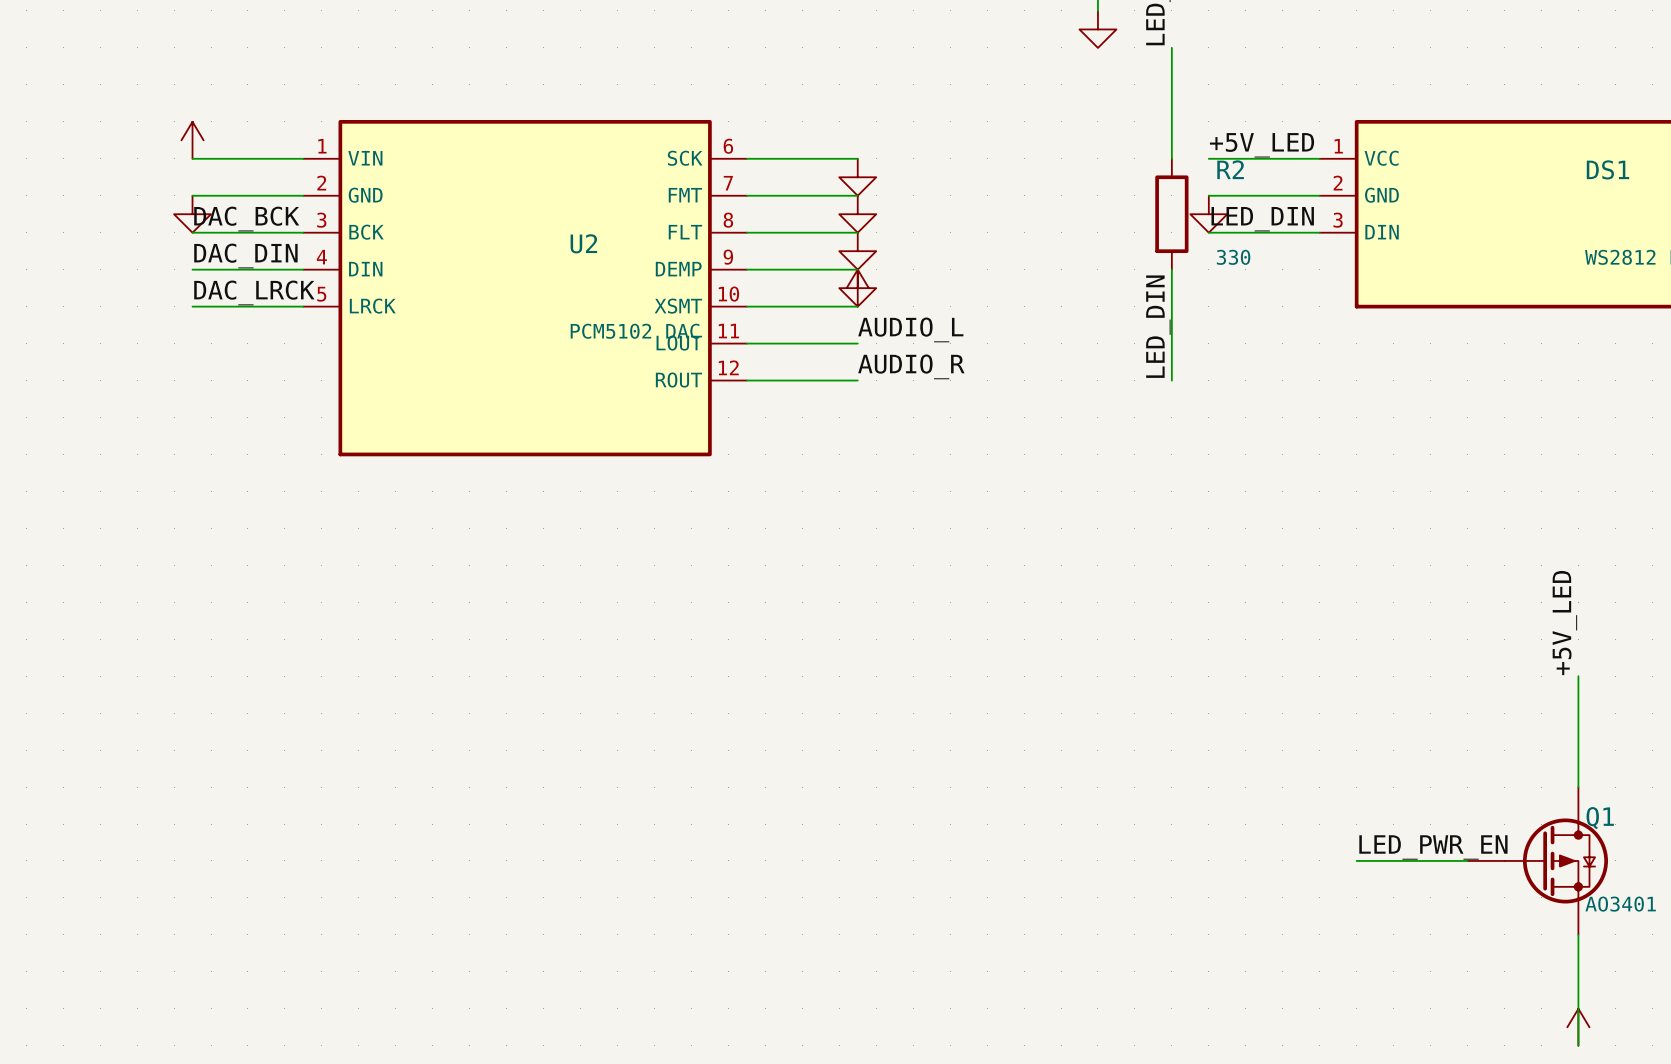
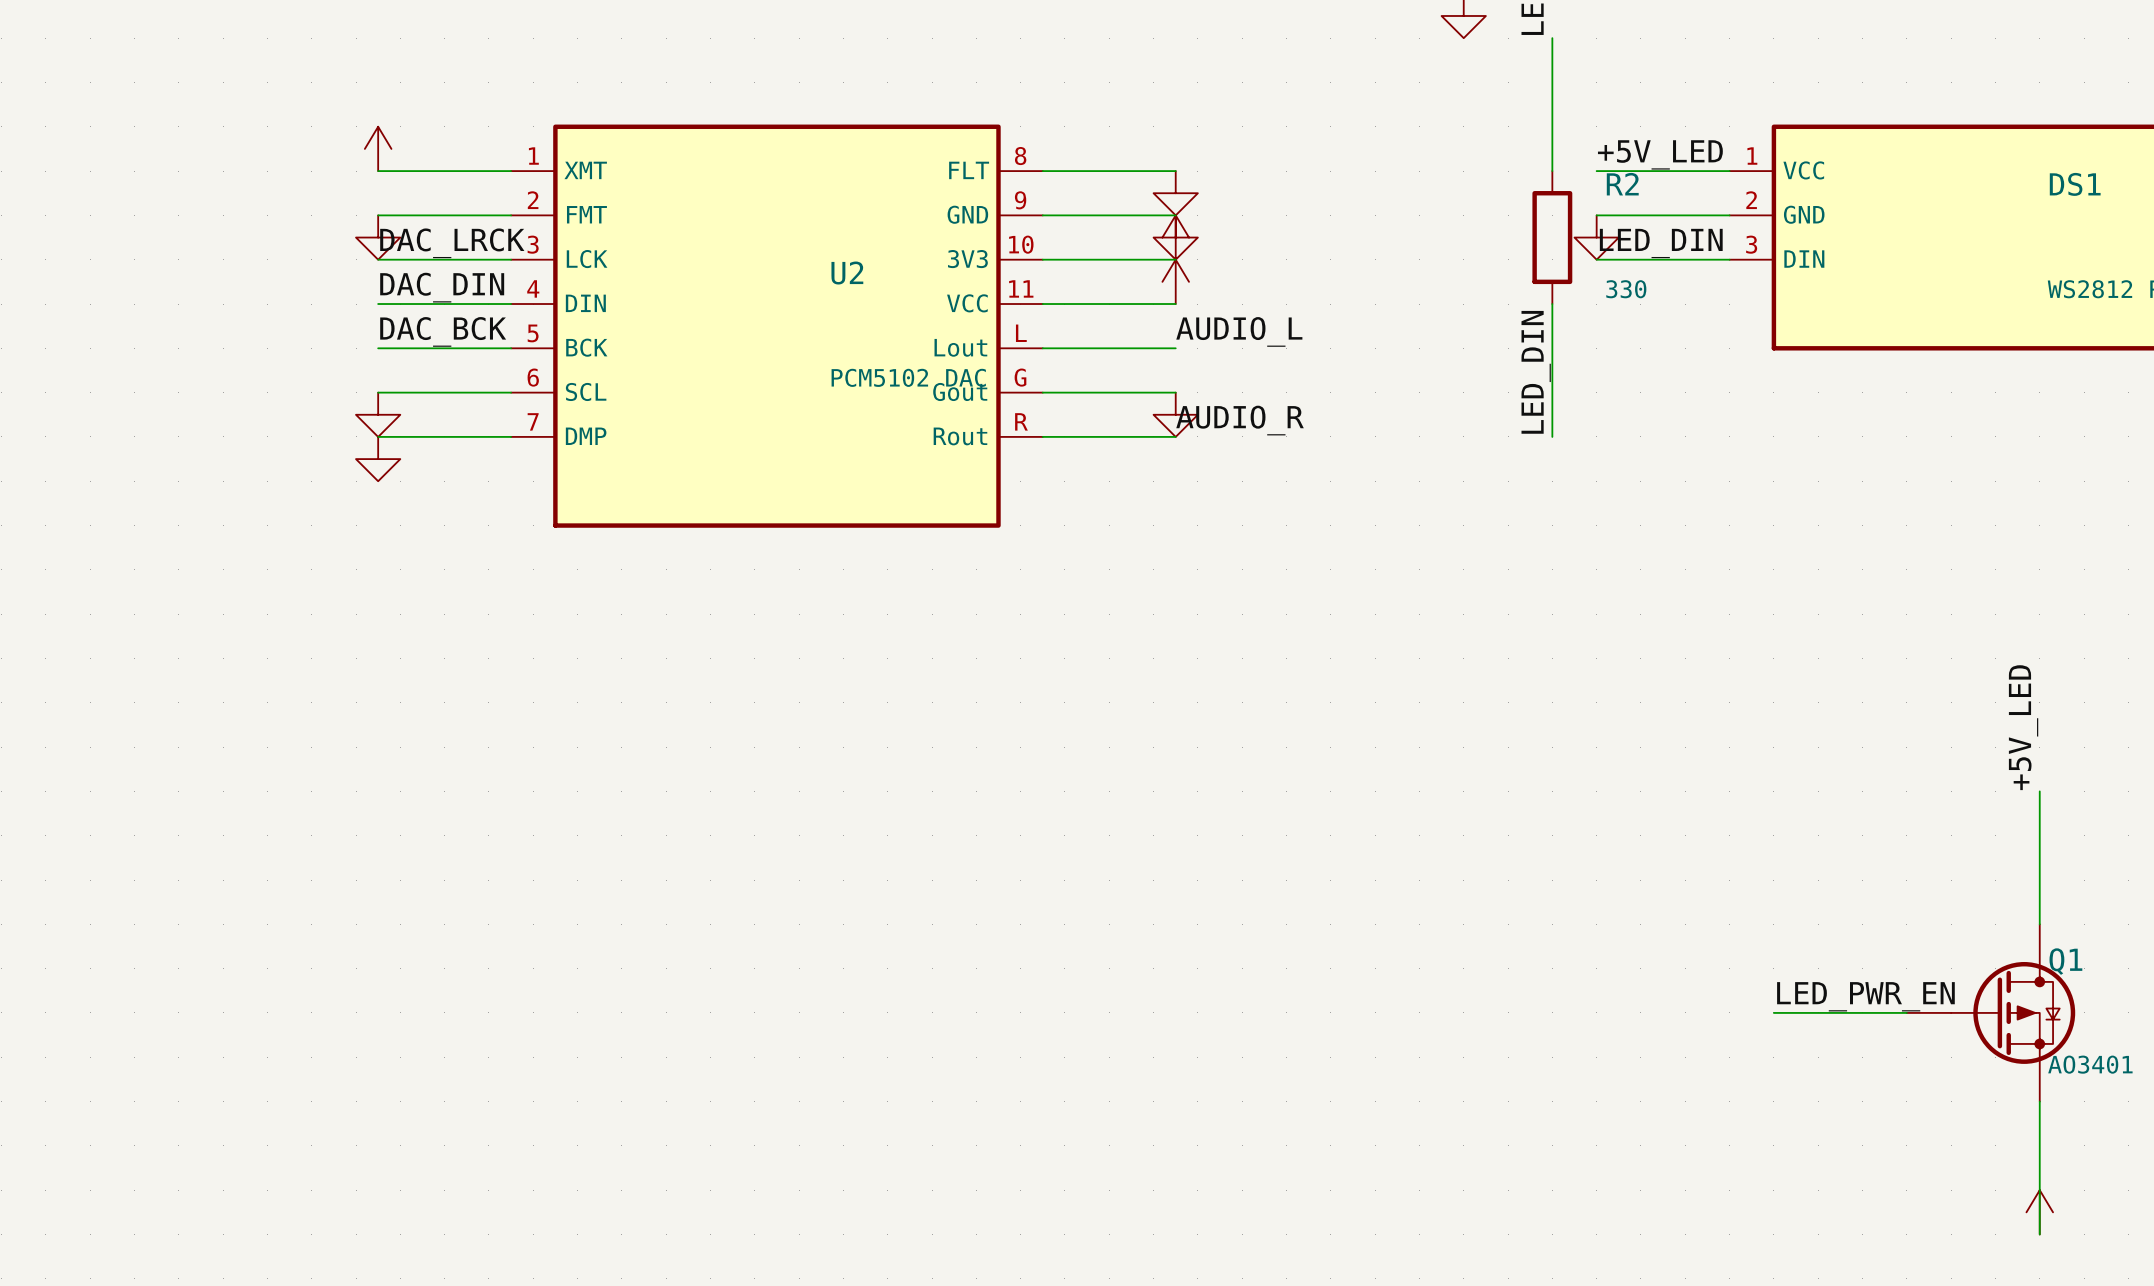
U2 symbol: [303, 119, 747, 457] -> [511, 124, 1043, 528]
label: DAC_BCK (246, 219) -> DAC_LRCK (452, 243)
power symbol shape: [839, 232, 877, 270] -> [1162, 259, 1190, 305]
power symbol position: (857, 288) -> (1175, 414)
power symbol position: (857, 288) -> (1175, 237)
label: DAC_LRCK (254, 292) -> DAC_BCK (443, 331)
label position: AUDIO_L (910, 329) -> AUDIO_L (1239, 331)
wire: none -> (378, 392) (511, 392)
power symbol: none -> (378, 414)
wire: none -> (378, 436) (511, 436)
power symbol: none -> (378, 459)

